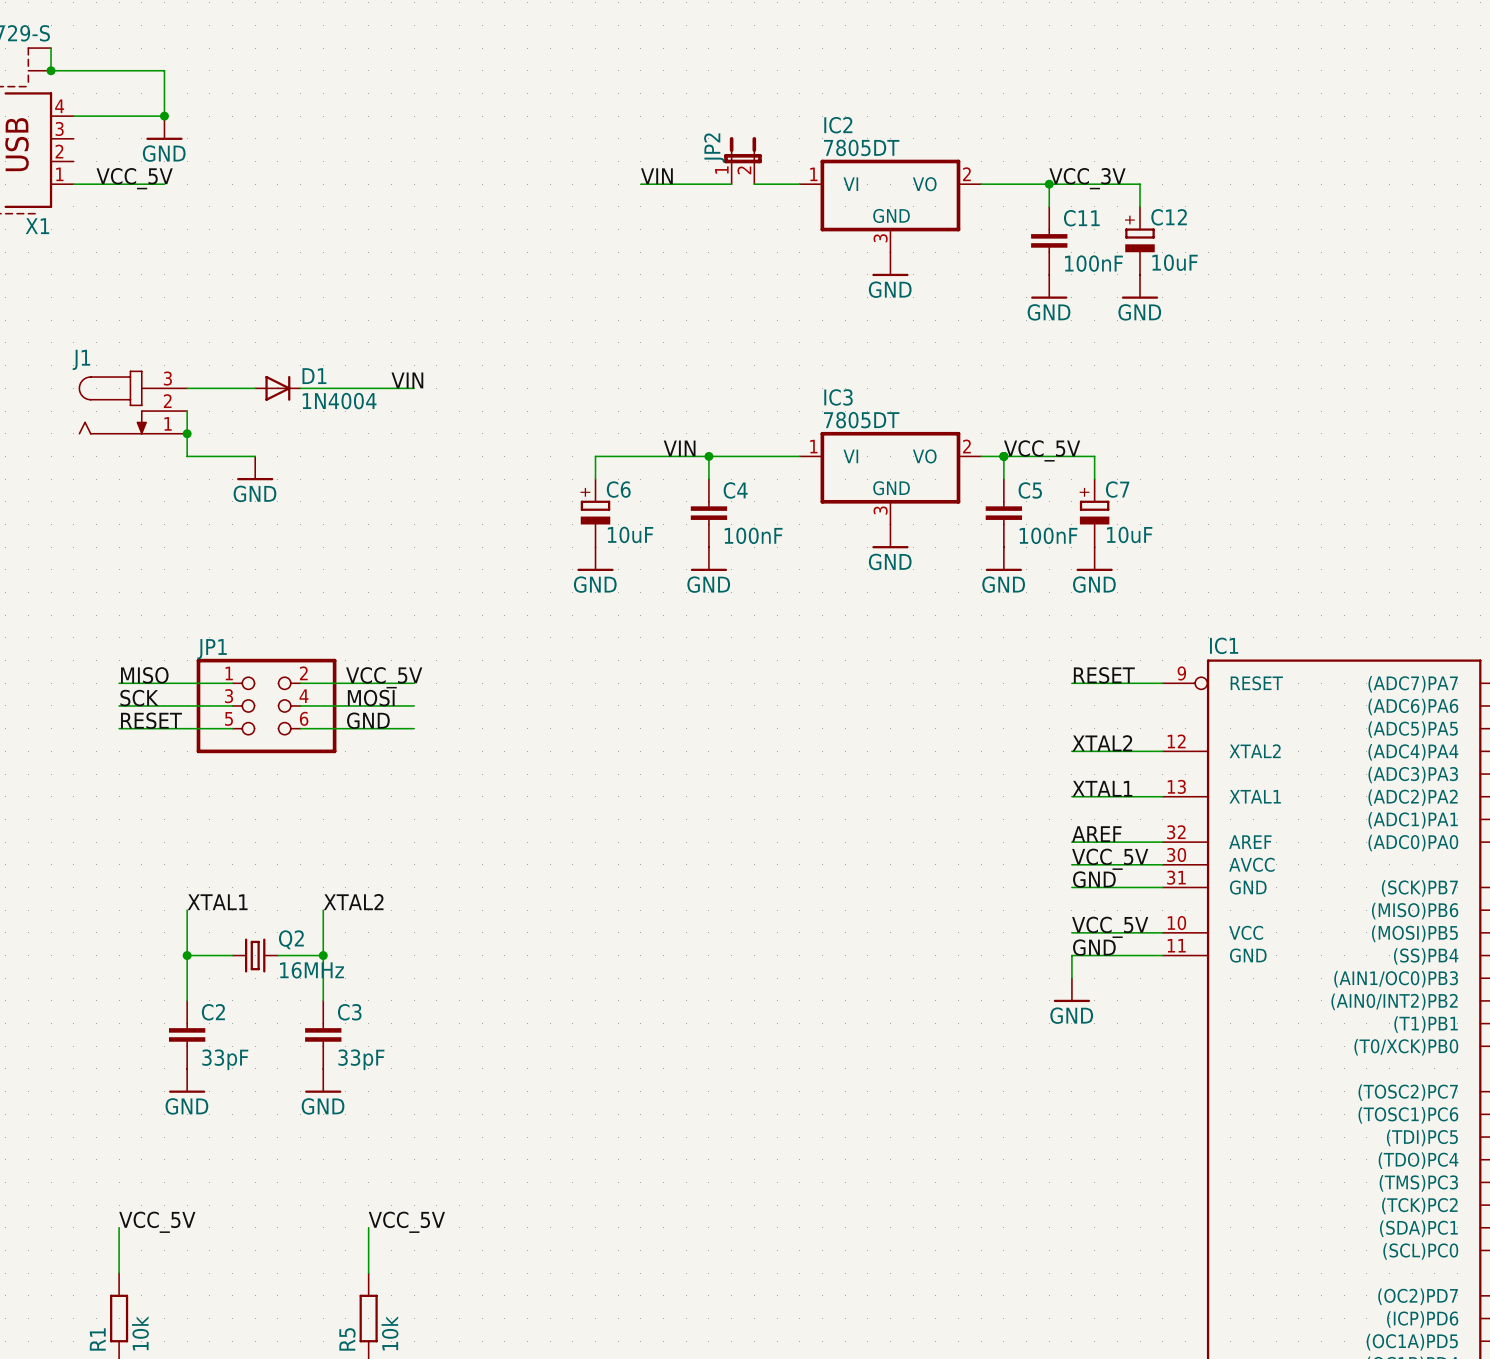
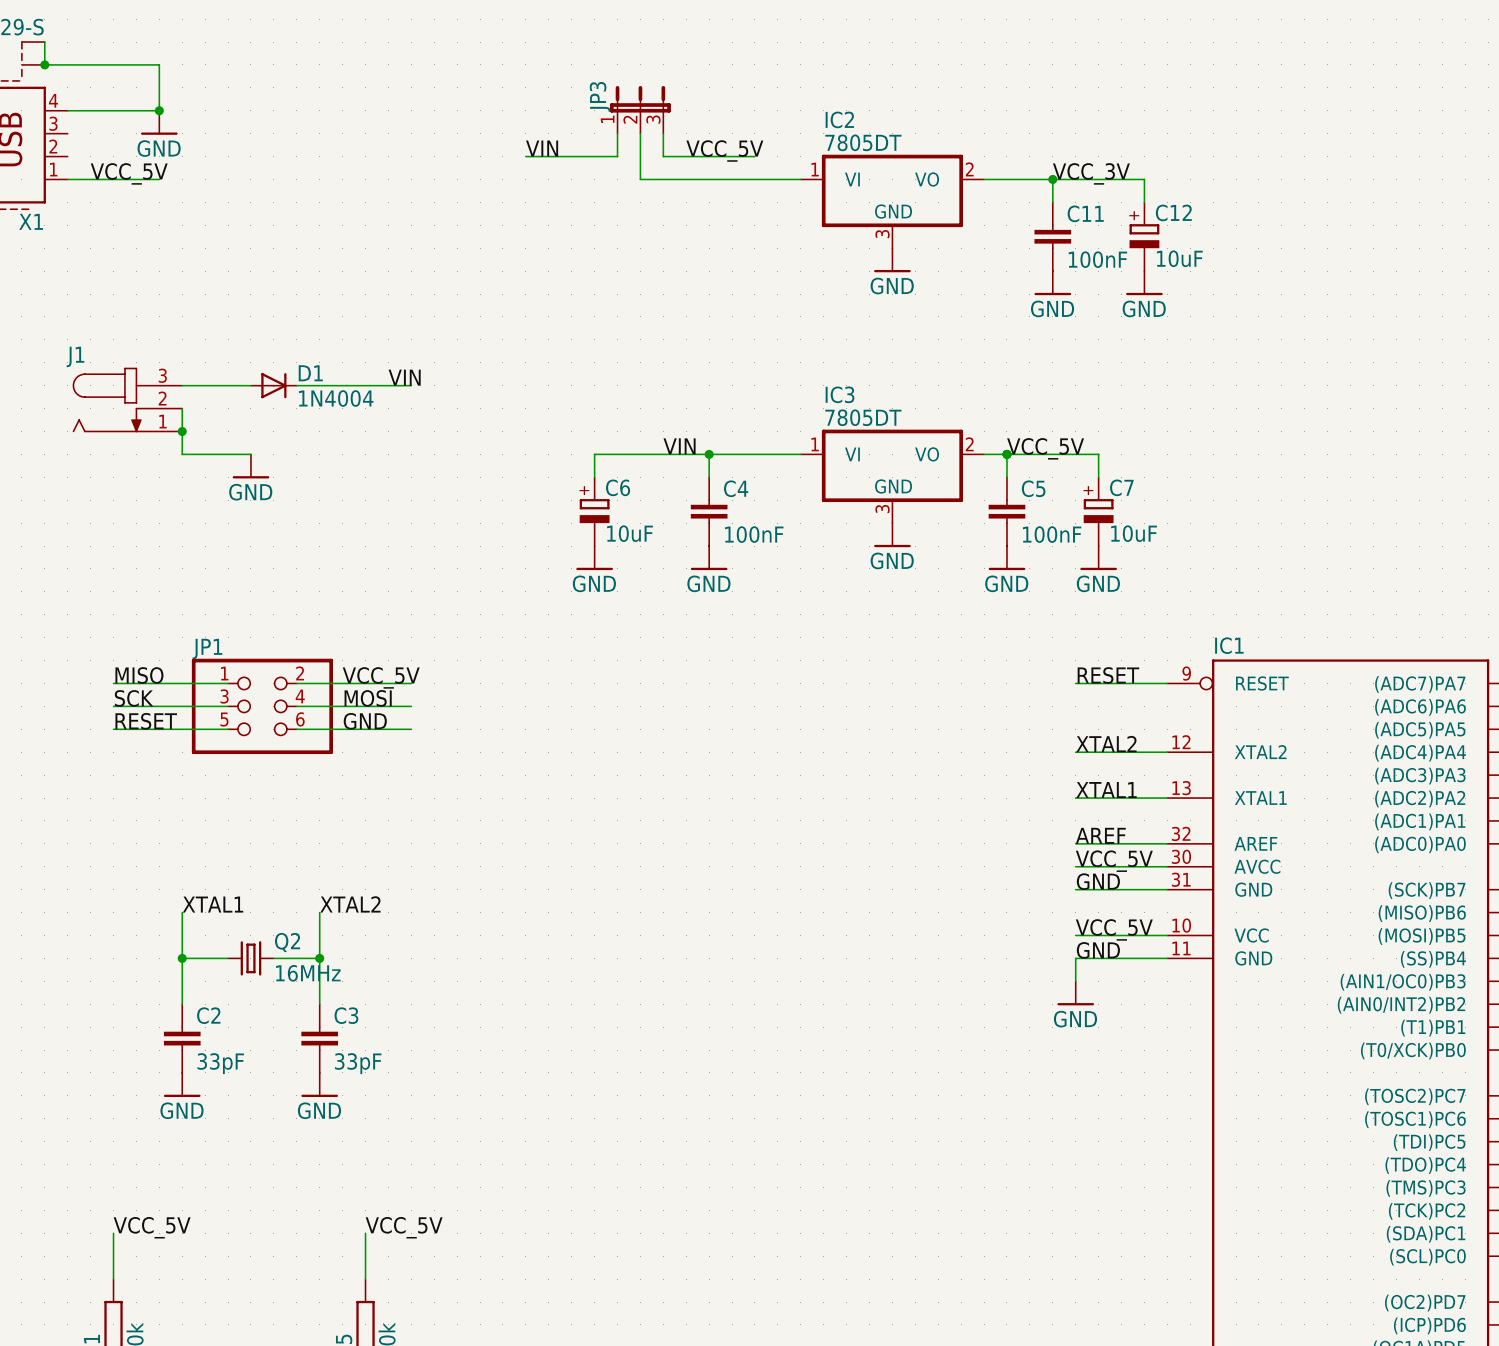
JP3: none -> (640, 109)
wire: none -> (617, 133) (617, 156) (525, 156)
wire: none -> (640, 133) (640, 179)
wire: none -> (663, 133) (663, 156) (754, 156)
label: none -> VCC_5V (724, 150)
JP2: (742, 160) -> none
label position: VIN (656, 176) -> VIN (542, 148)
wire: none -> (732, 179) (754, 179)

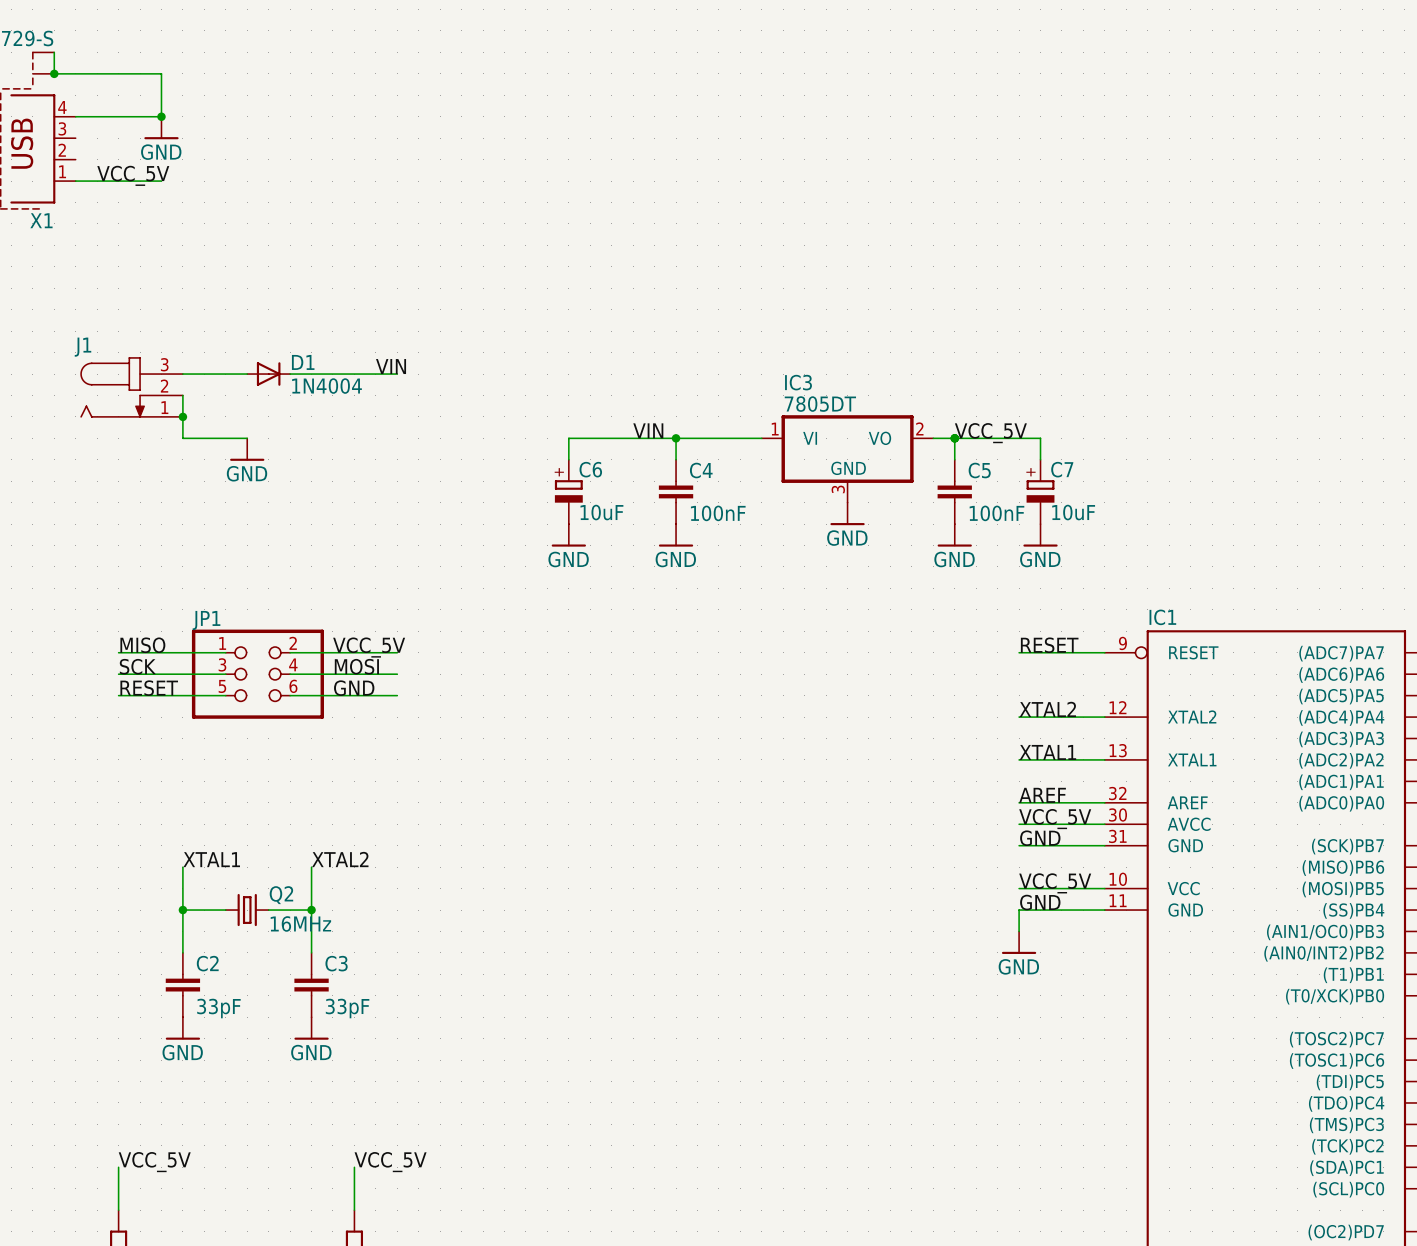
JP3: (640, 109) -> none
wire: (617, 133) (617, 156) (525, 156) -> none
wire: (640, 133) (640, 179) (800, 179) -> none
wire: (663, 133) (663, 156) (754, 156) -> none
label: VIN (542, 148) -> none
label: VCC_5V (724, 150) -> none
label: VCC_3V (1091, 173) -> none
wire: (984, 179) (1144, 179) (1144, 202) -> none
wire: (1052, 179) (1052, 202) -> none
junction: (1052, 179) -> none
IC2: 7805DT (892, 201) -> none
C11: 100nF (1052, 236) -> none
C12: 10uF (1144, 236) -> none
power symbol: GND (892, 260) -> none
power symbol: GND (1052, 283) -> none
power symbol: GND (1144, 283) -> none

